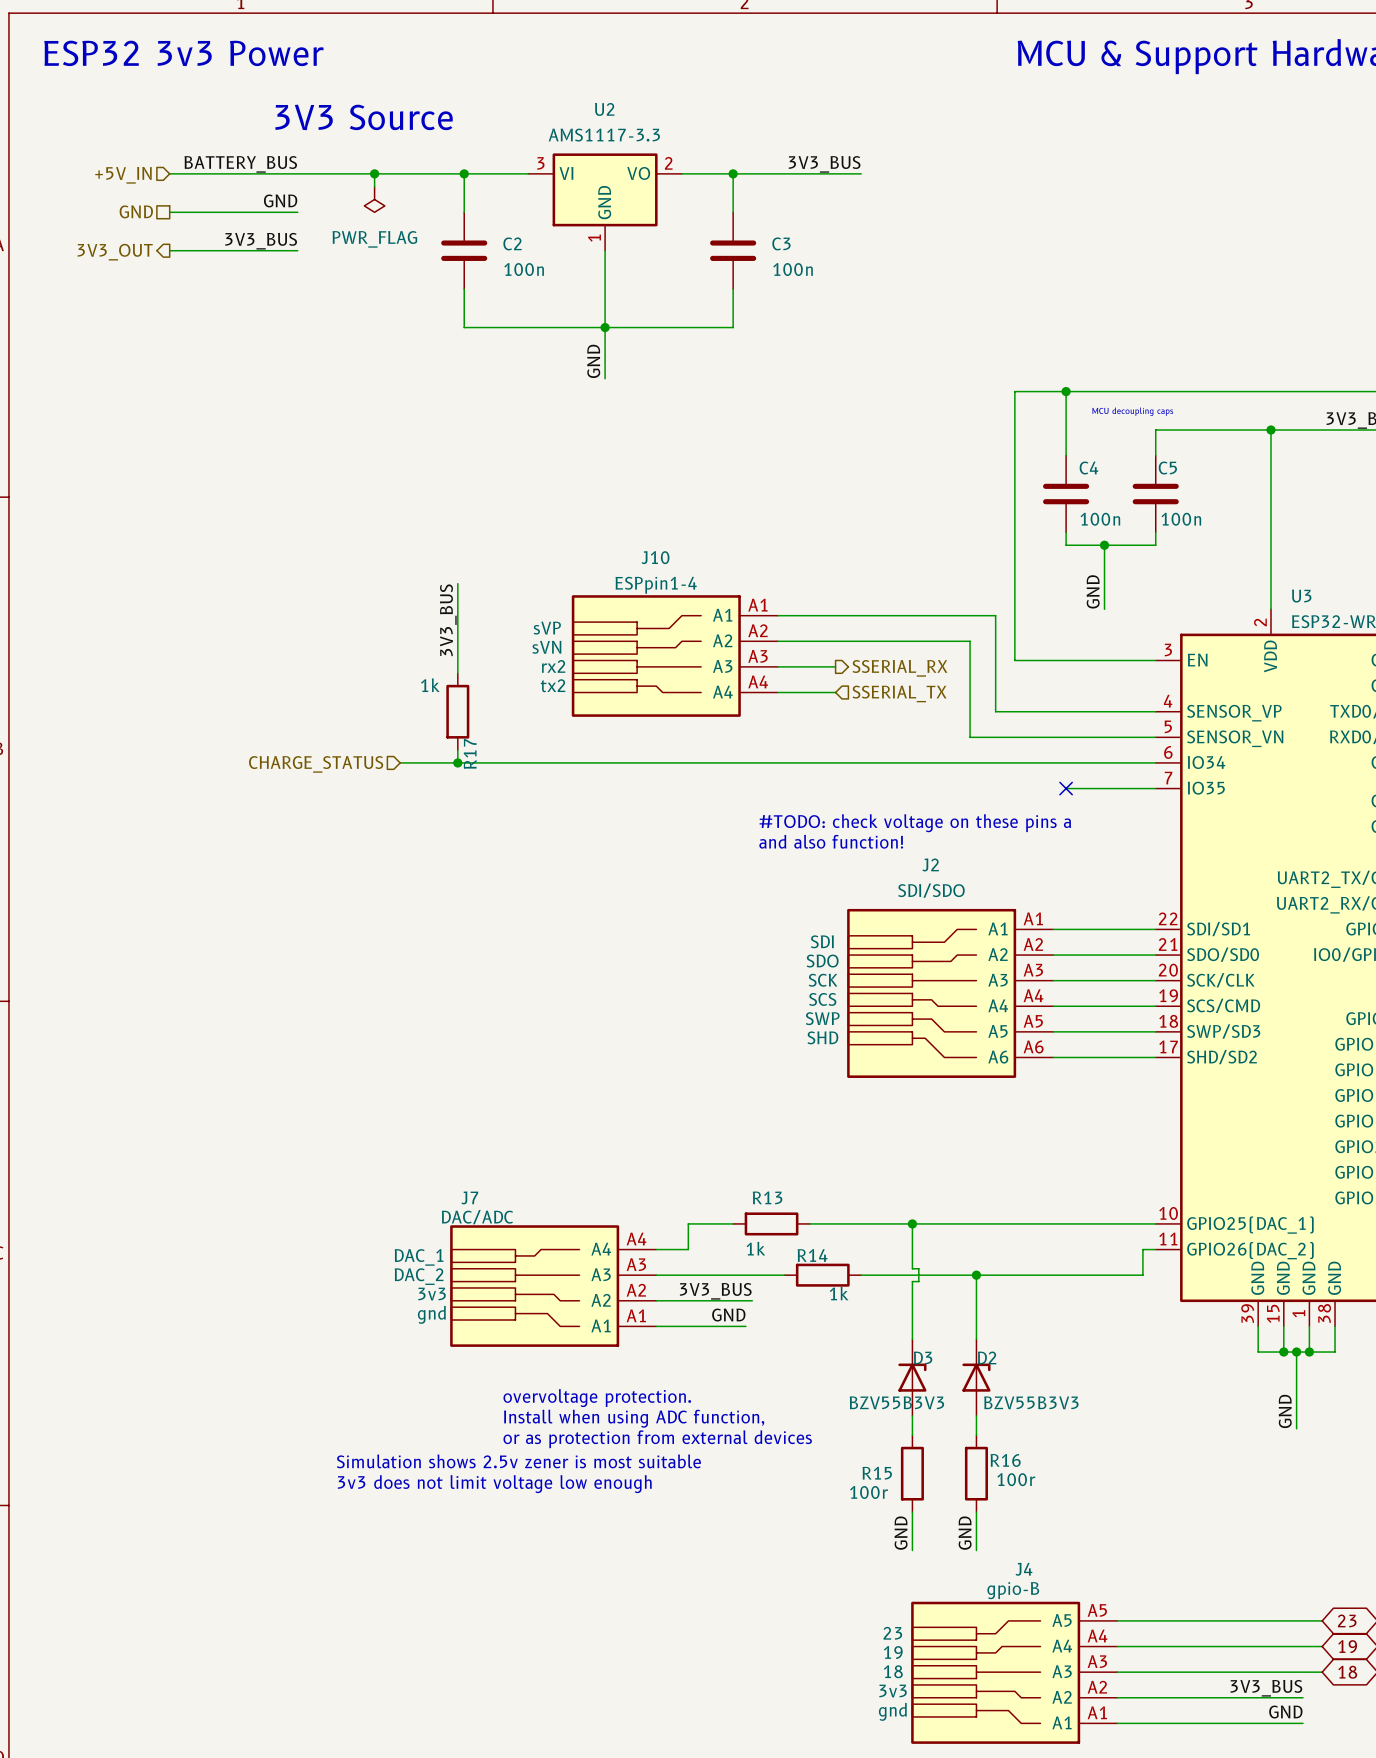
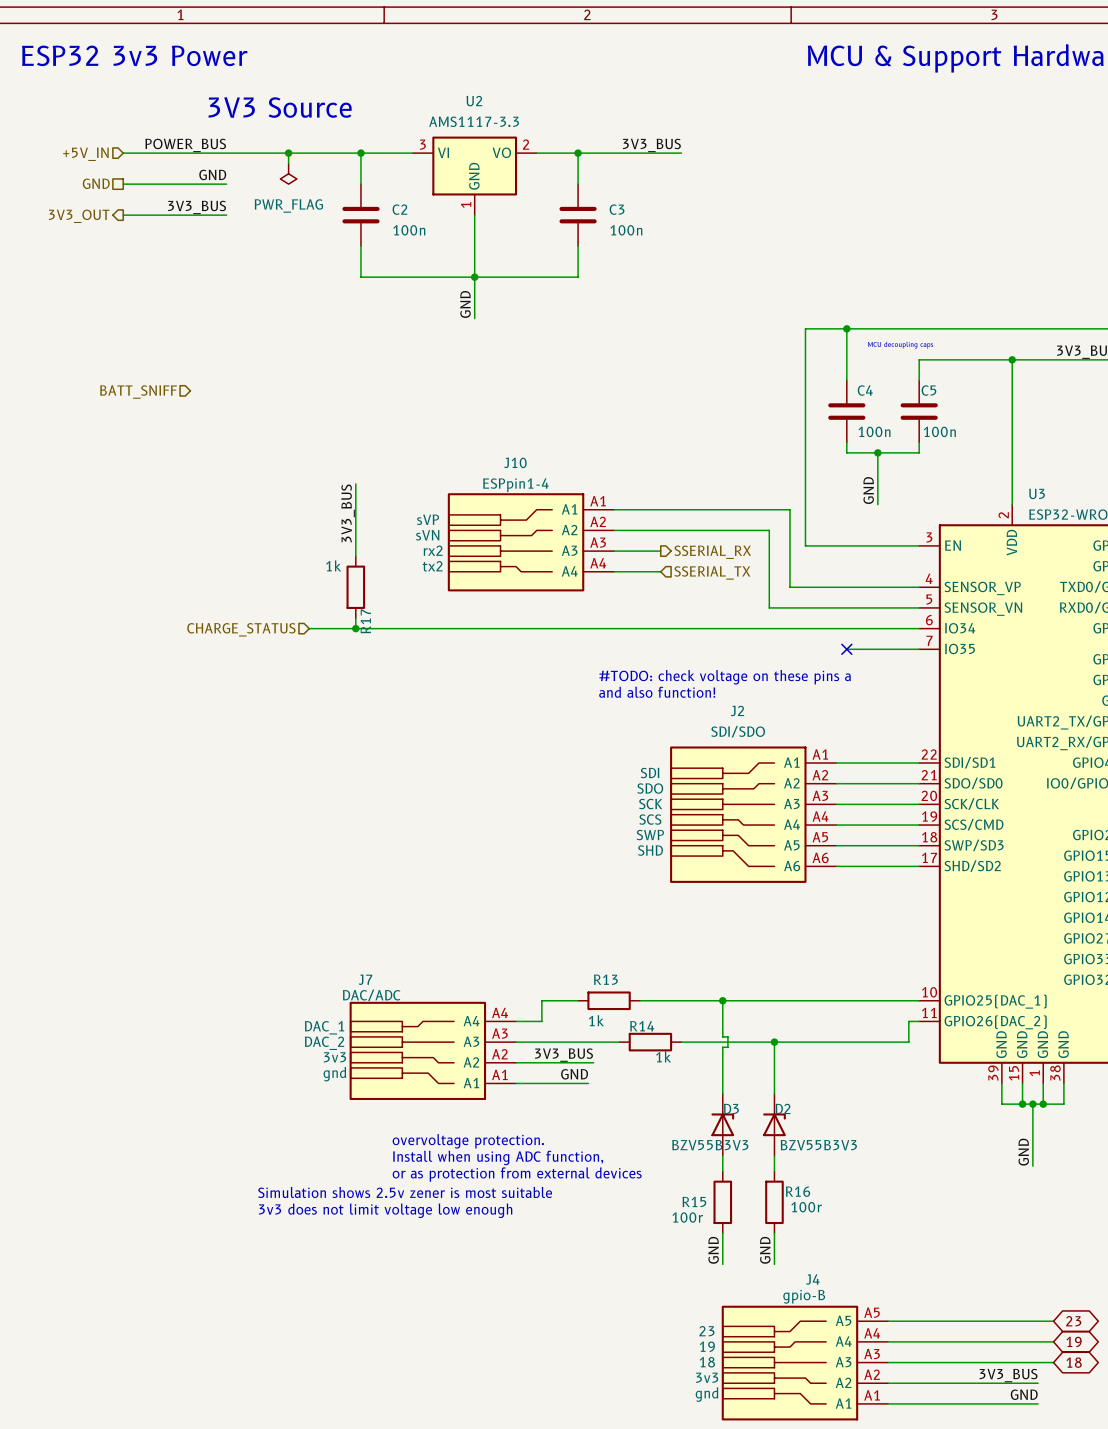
label: BATTERY_BUS (240, 164) -> POWER_BUS (185, 145)
hierarchical label: none -> BATT_SNIFF (138, 392)

